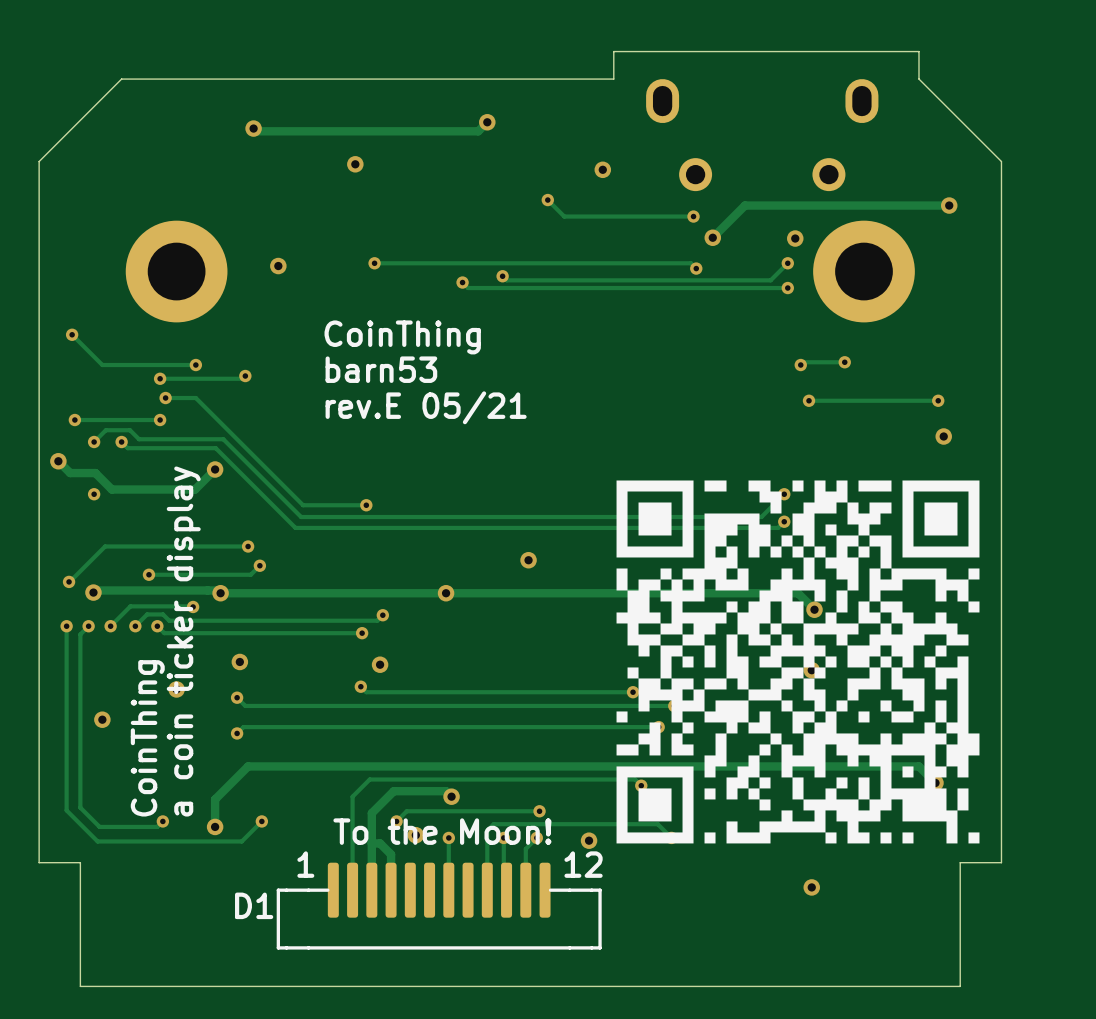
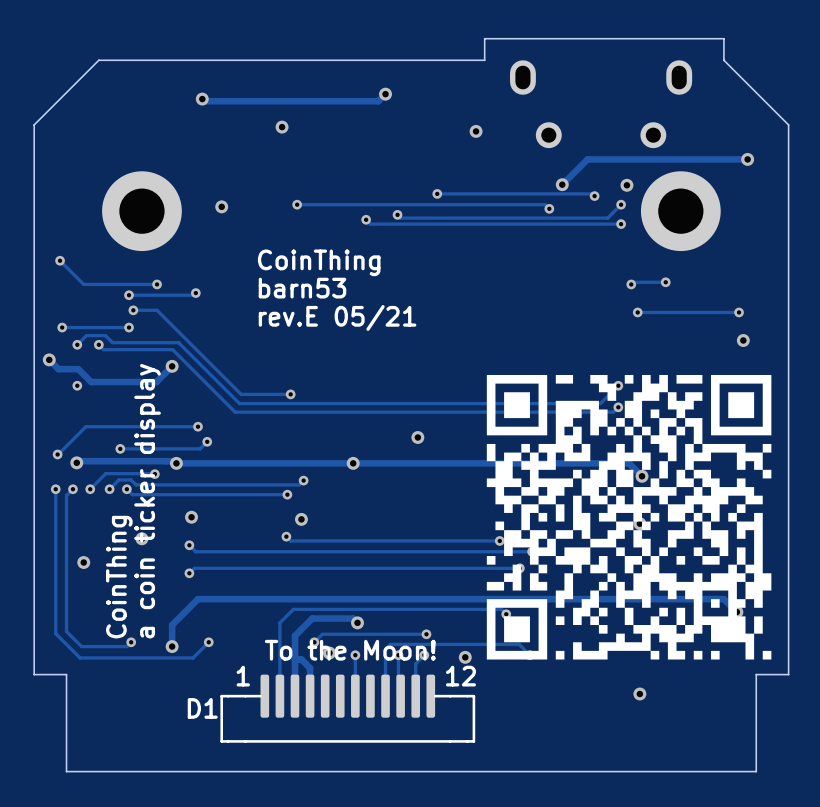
track: (547, 200) (564, 216) (693, 216) -> none
via position: (547, 200) -> (437, 193)
via position: (693, 216) -> (594, 196)
track: none -> (437, 193) (592, 193) (594, 196)

